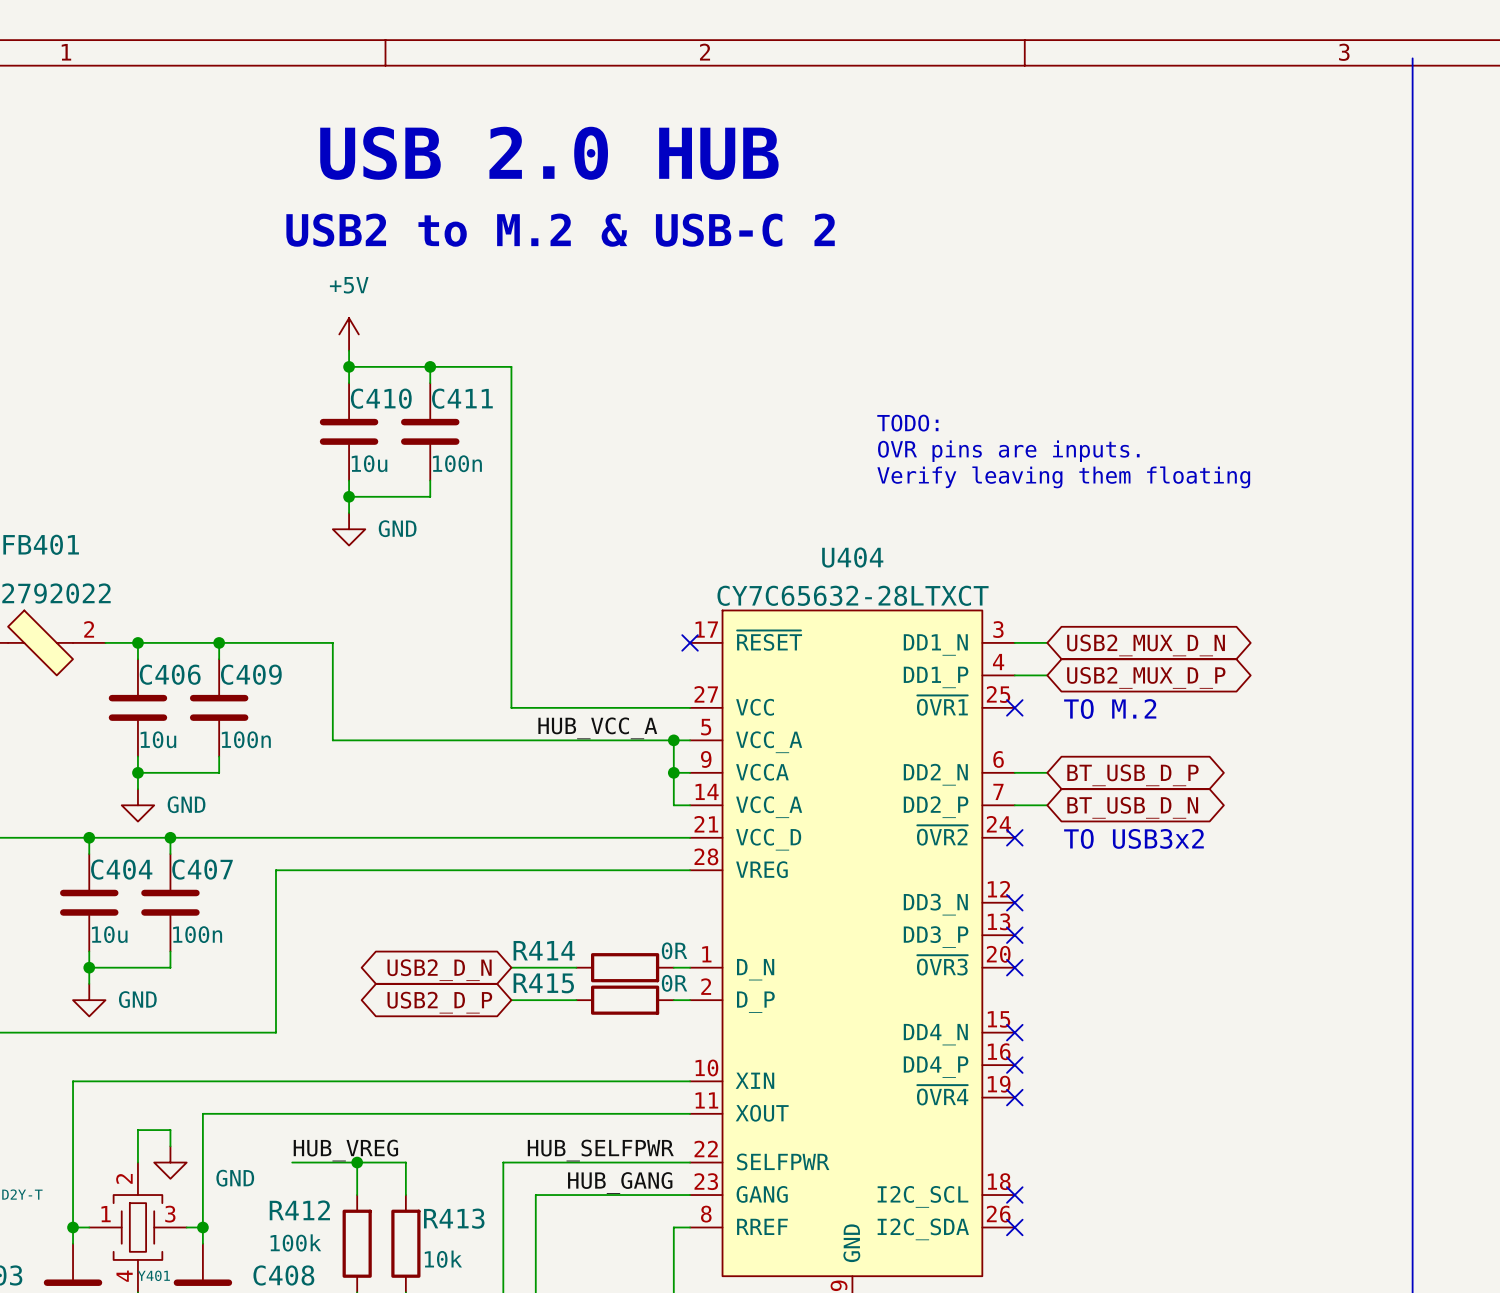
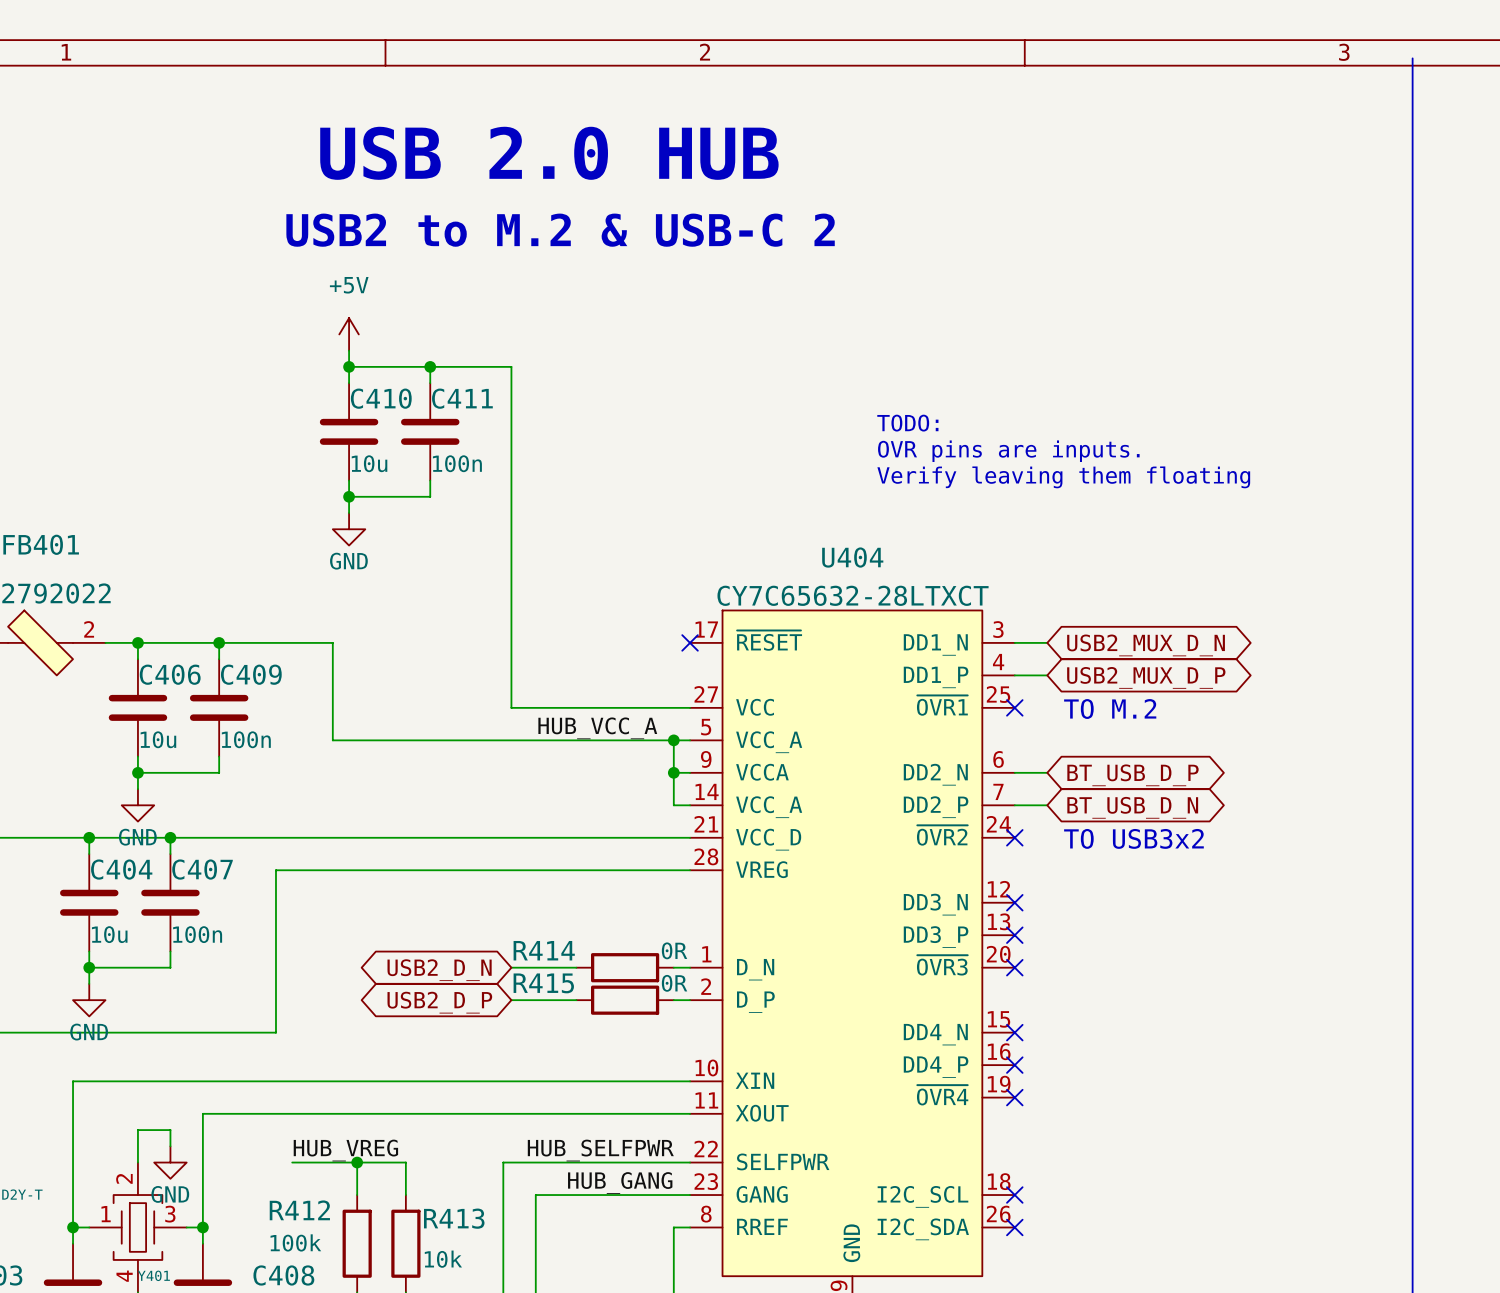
power symbol text position: GND (397, 528) -> GND (348, 561)
power symbol text position: GND (186, 804) -> GND (137, 837)
power symbol text position: GND (137, 999) -> GND (89, 1032)
power symbol text position: GND (235, 1178) -> GND (170, 1194)

